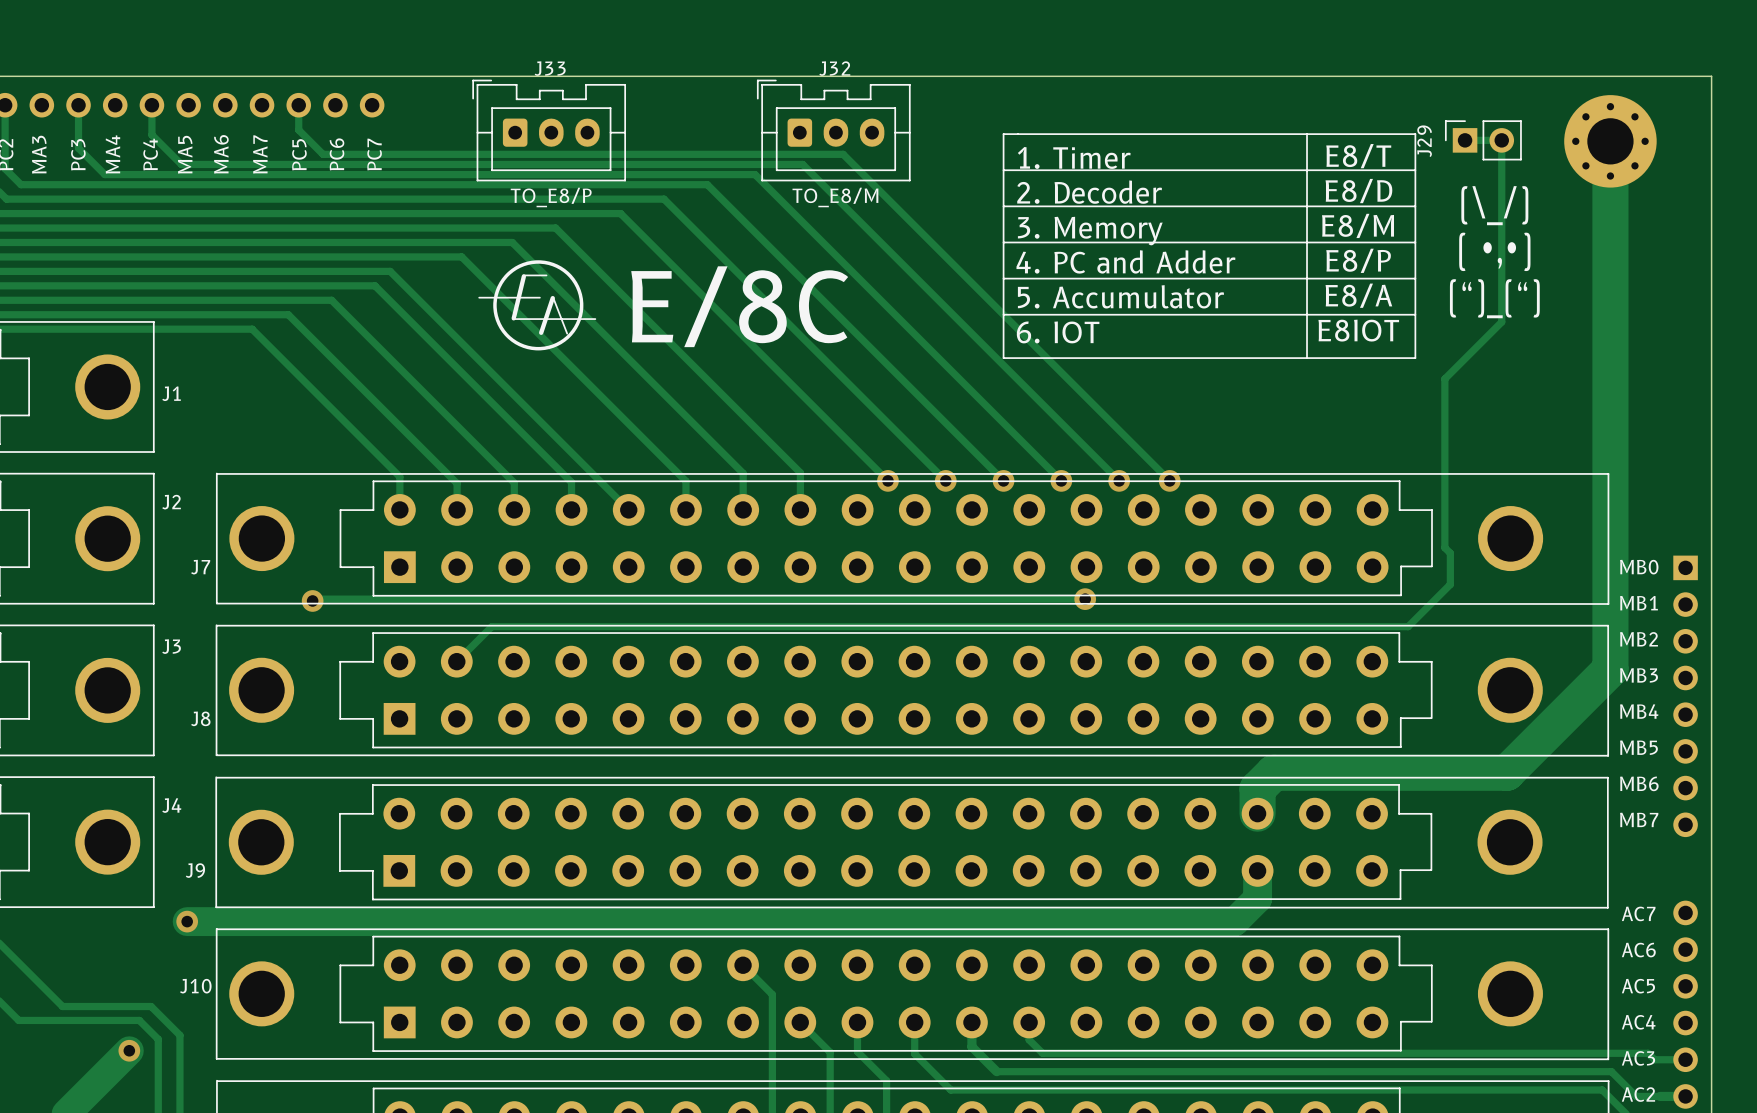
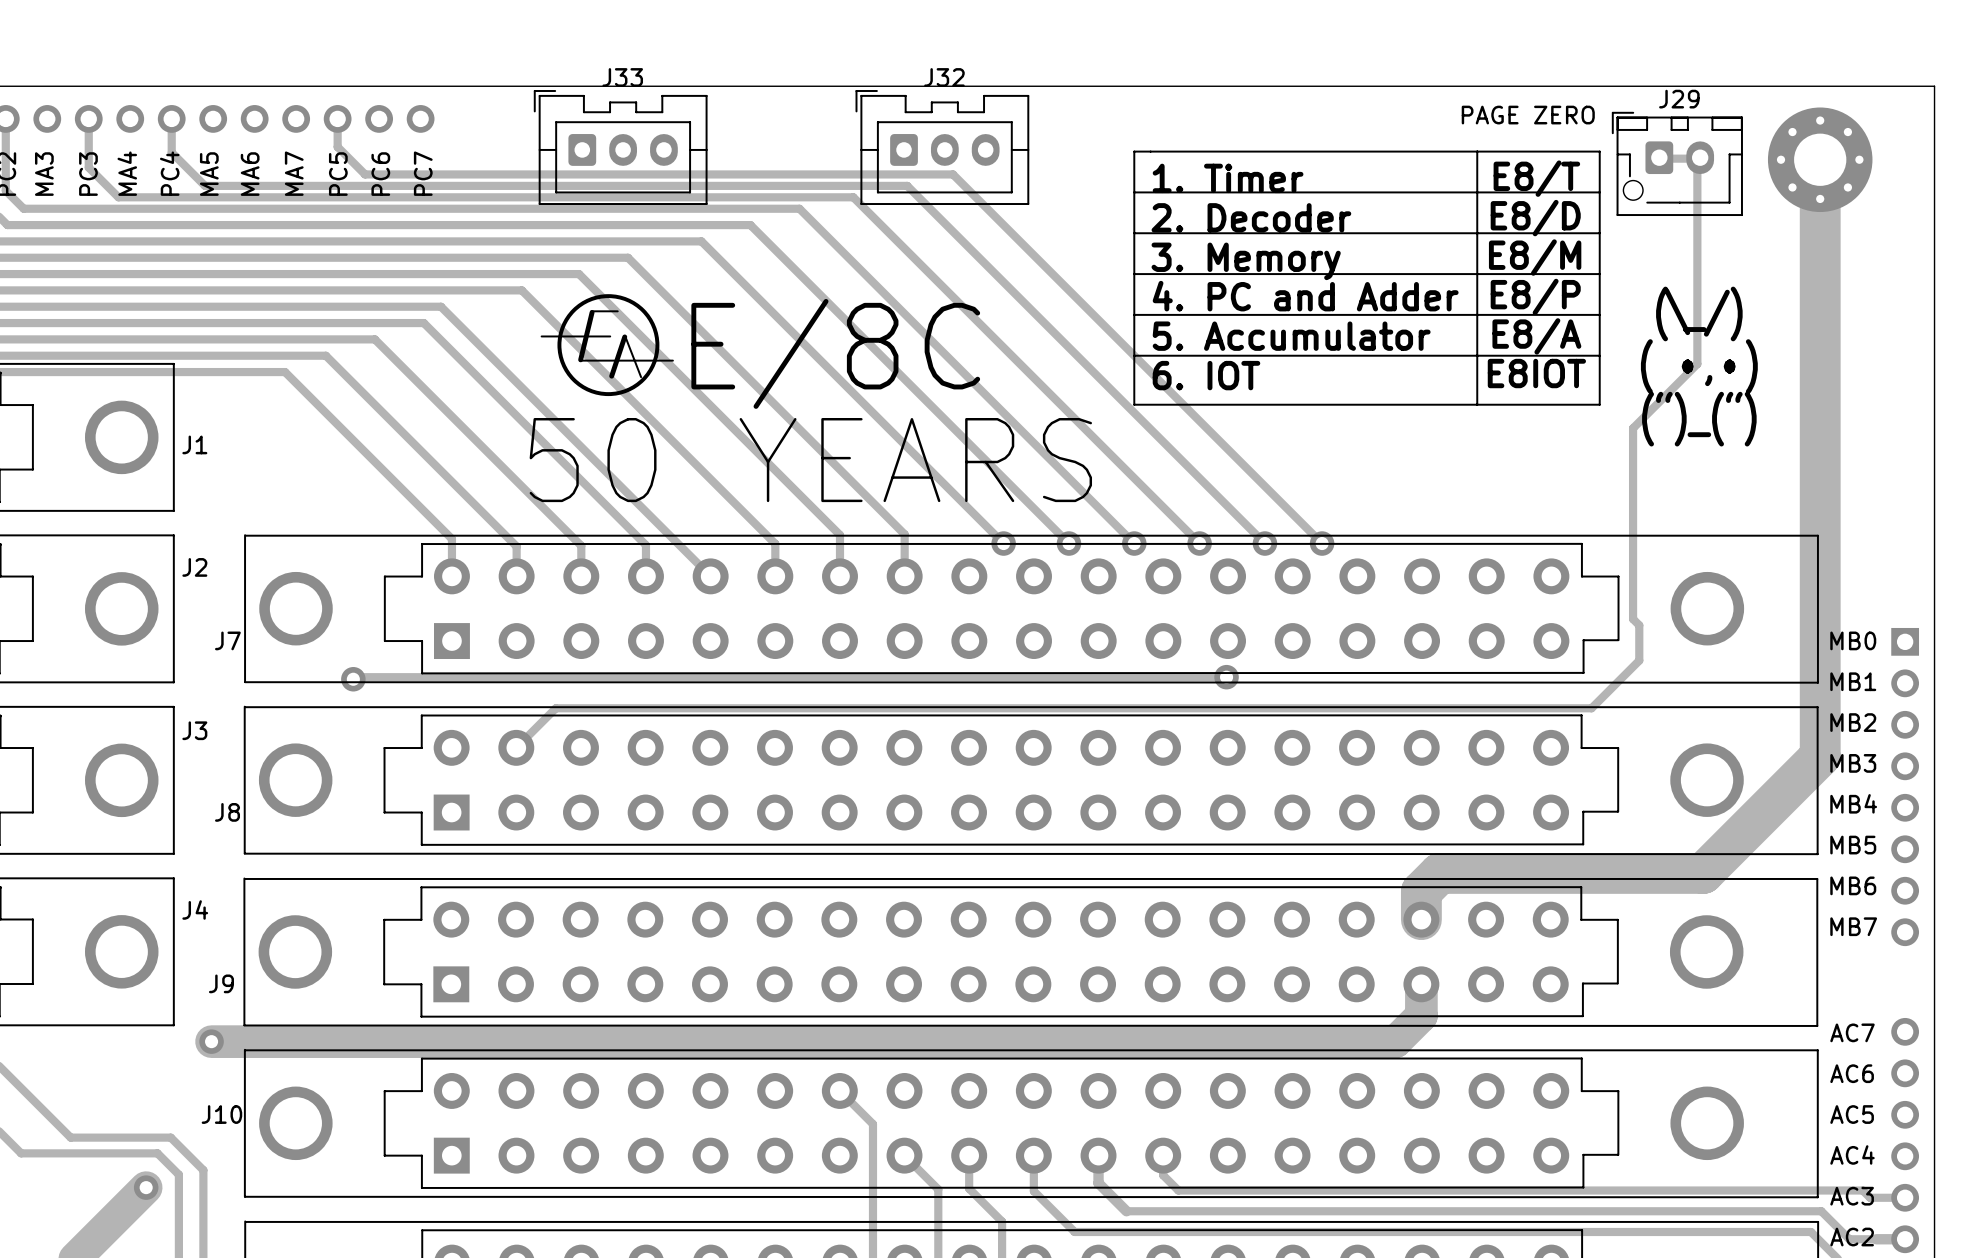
text: none -> PAGE ZERO (1528, 115)
J29 footprint: [1444, 120, 1522, 161] -> [1611, 111, 1743, 217]
J29 name position: J29 (1424, 141) -> J29 (1679, 99)
J33 value: TO_E8/P (551, 197) -> none
J32 value: TO_E8/M (835, 197) -> none
text position: (\_/) (1494, 205) -> (\_/) (1699, 313)
text position: ( •,•) (1494, 251) -> ( •,•) (1699, 366)
text position: (“)_(“) (1494, 298) -> (“)_(“) (1699, 419)
text: none -> 50 YEARS (810, 460)

